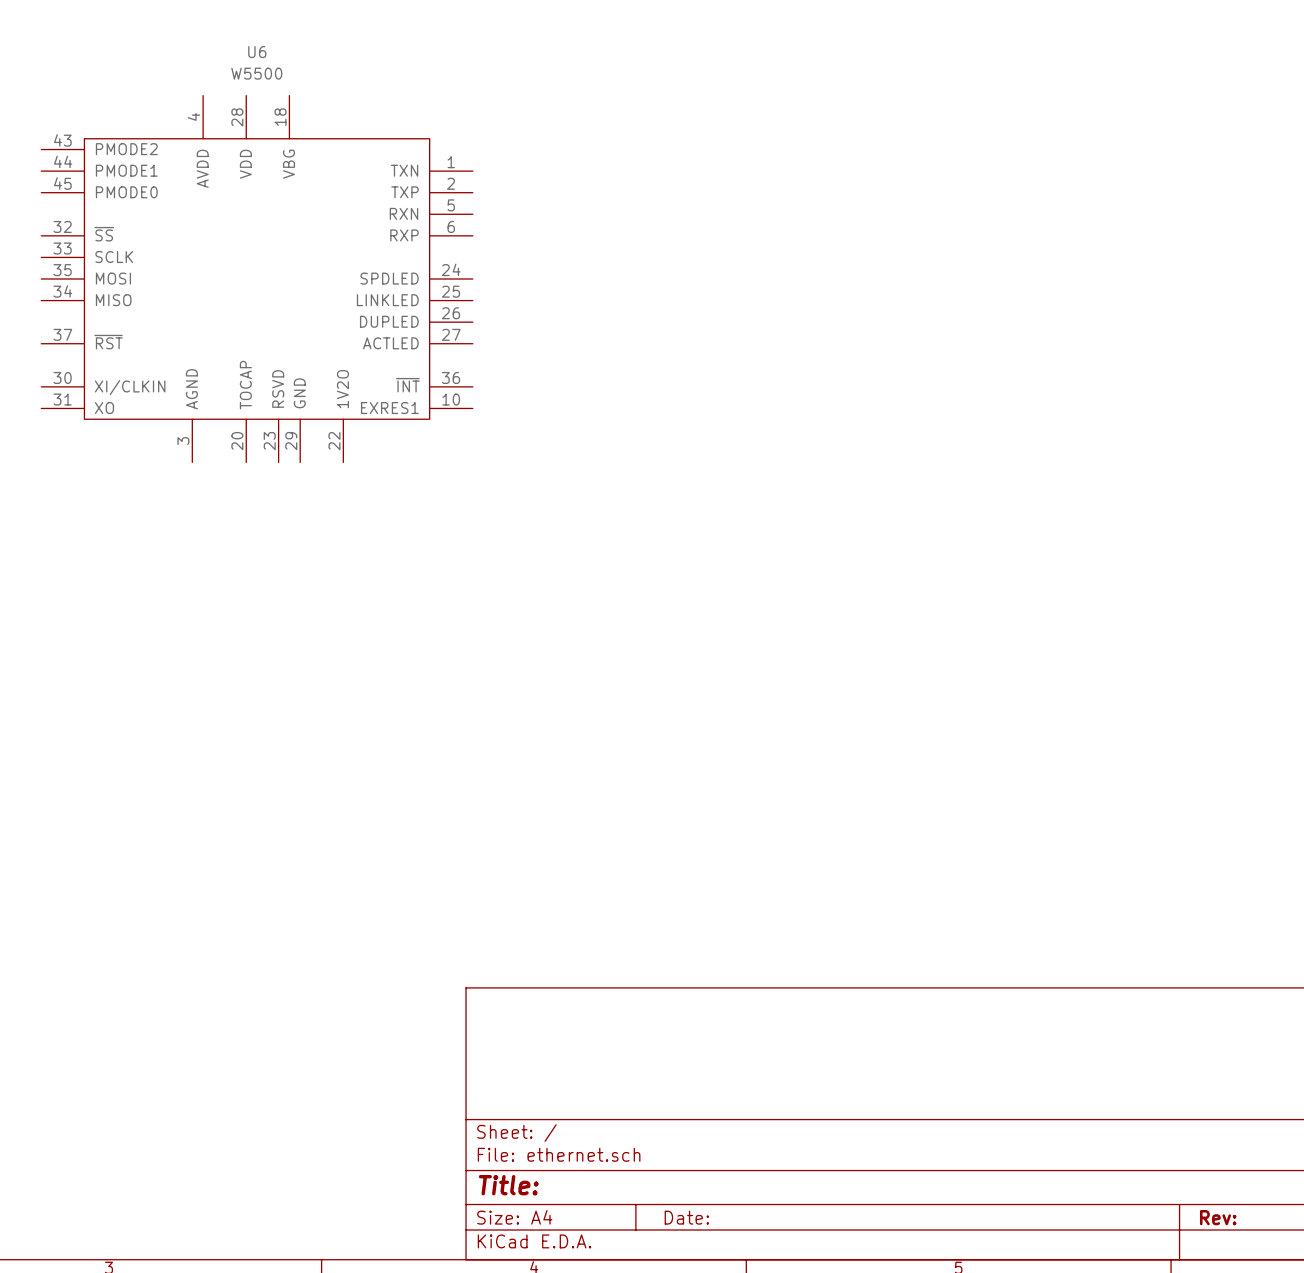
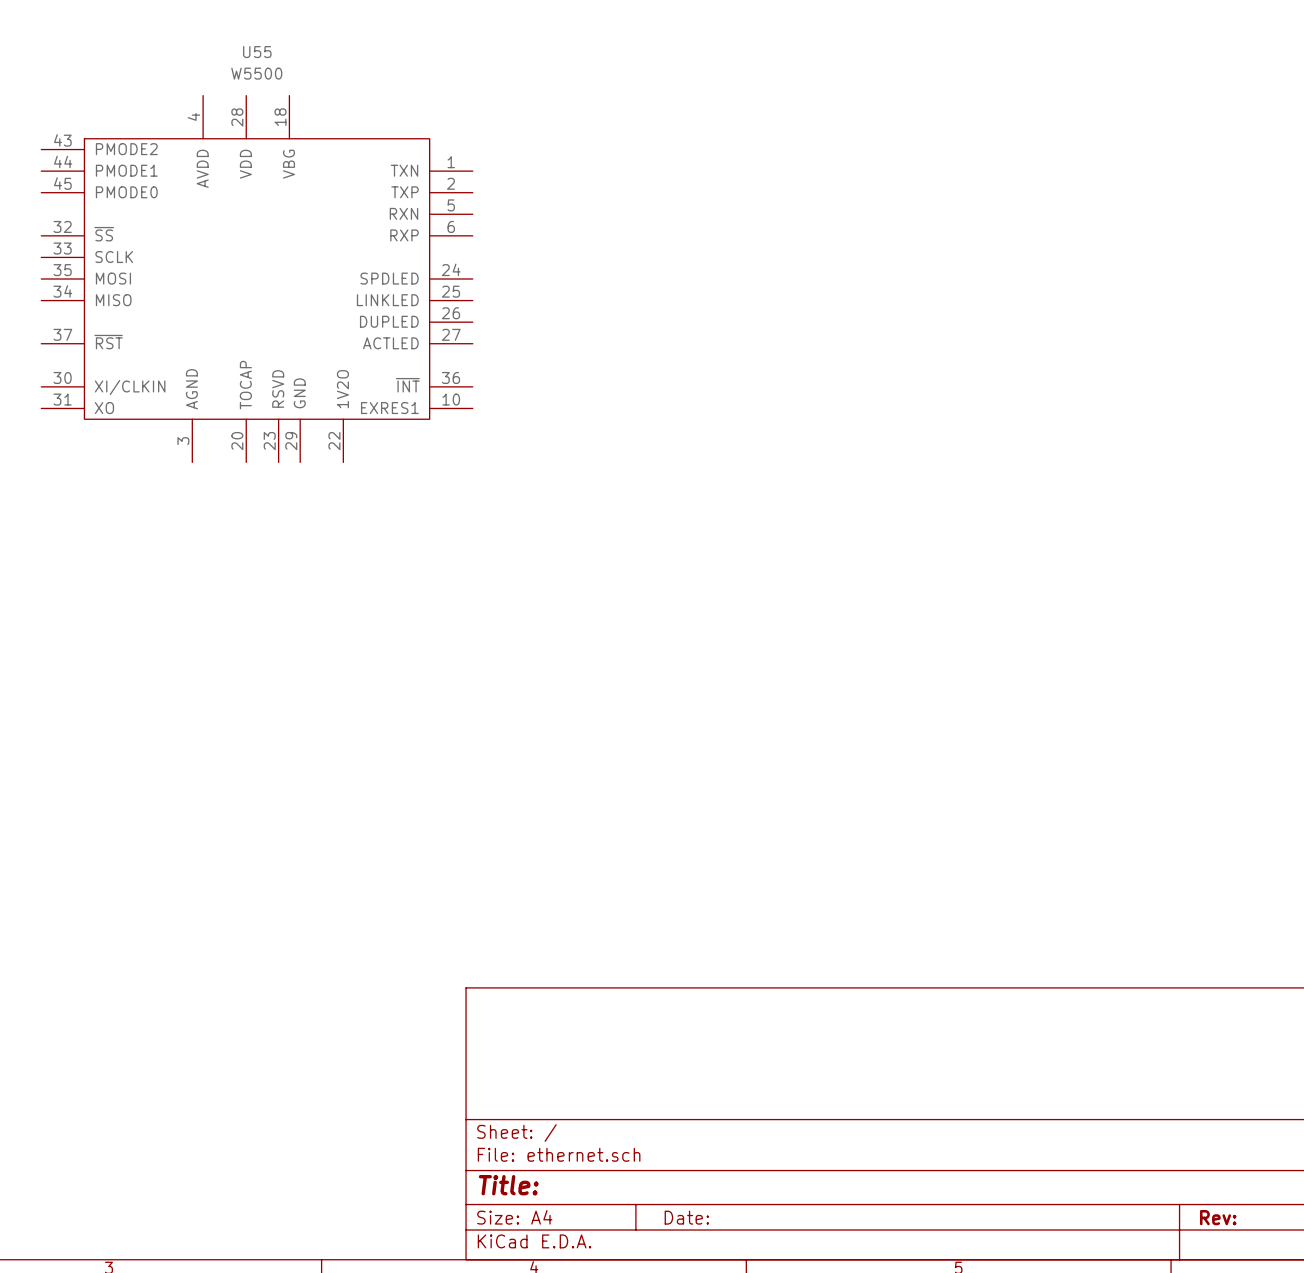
U6 name: U6 (257, 52) -> U55 (257, 52)

